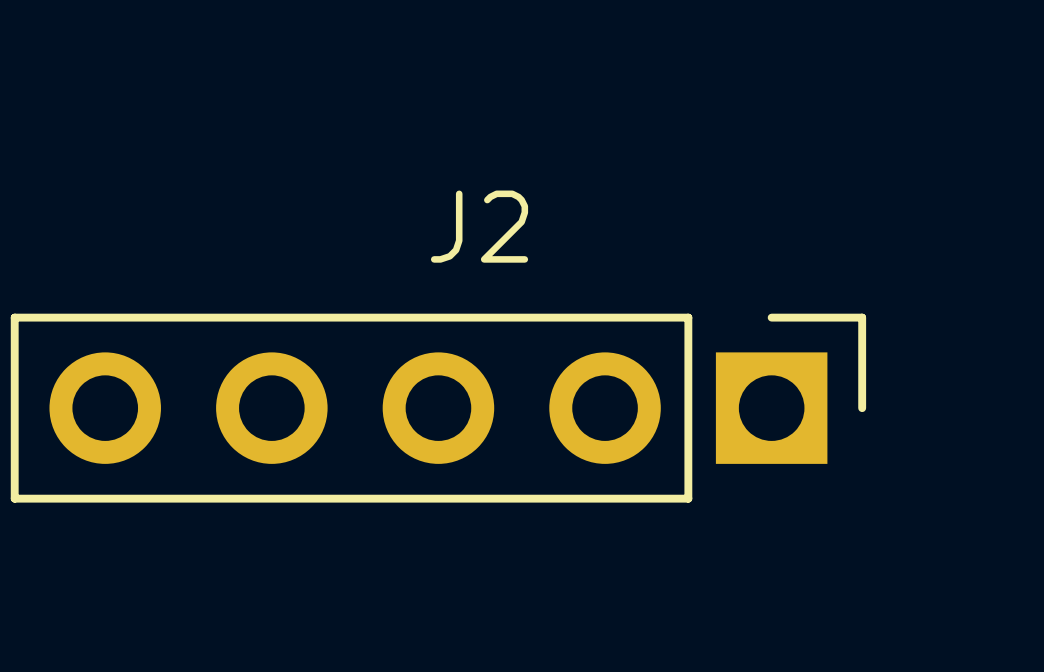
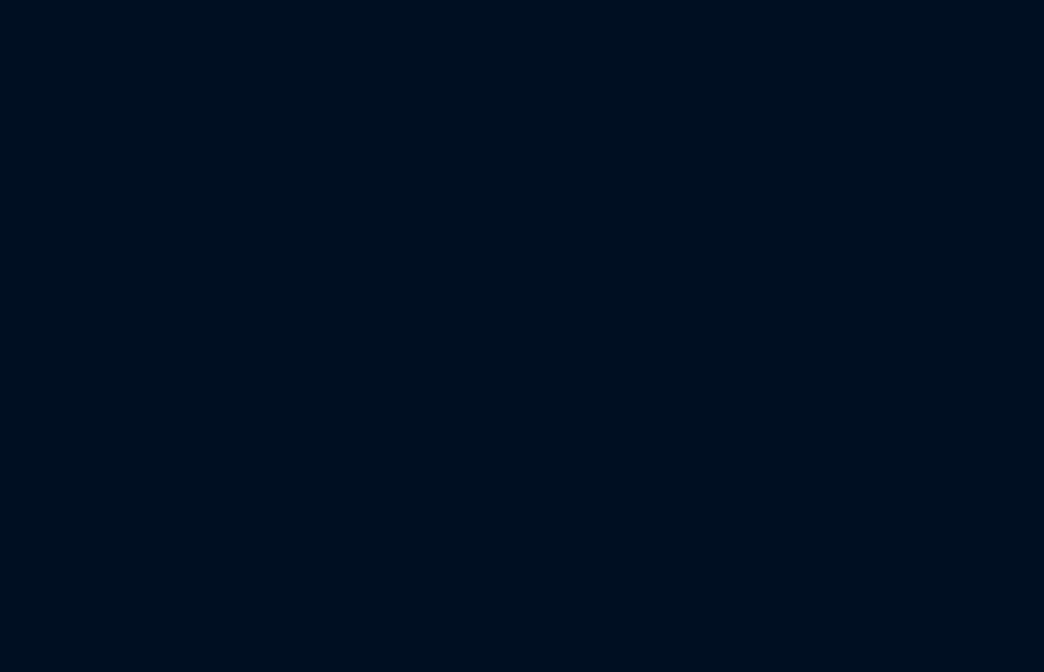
J2: (438, 408) -> none

